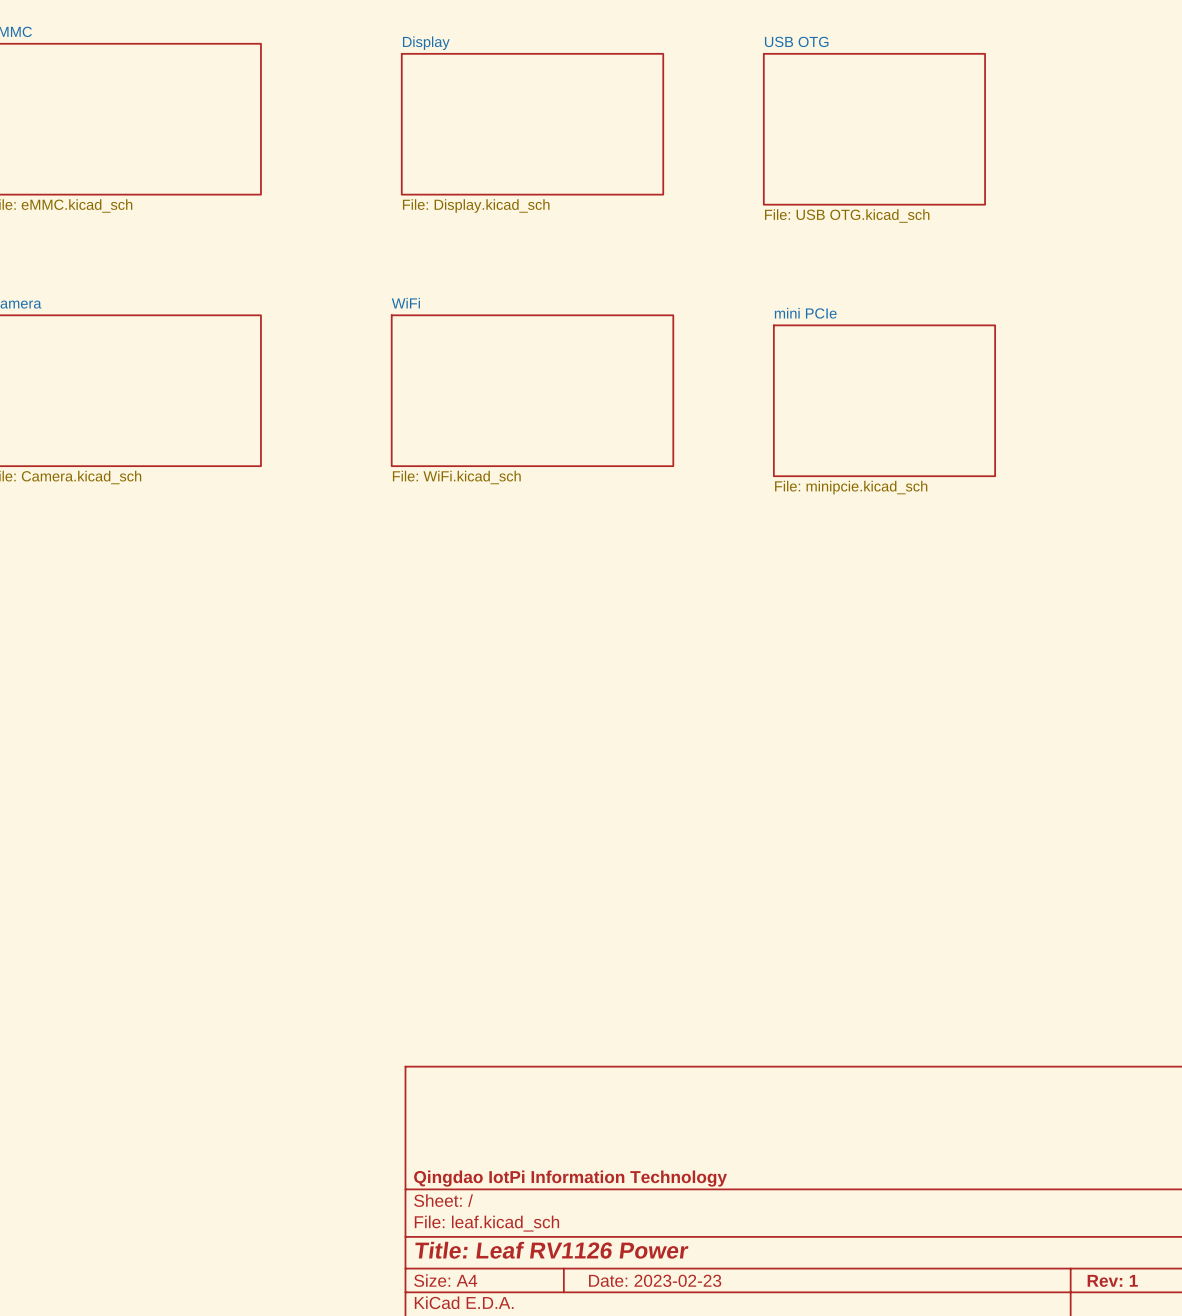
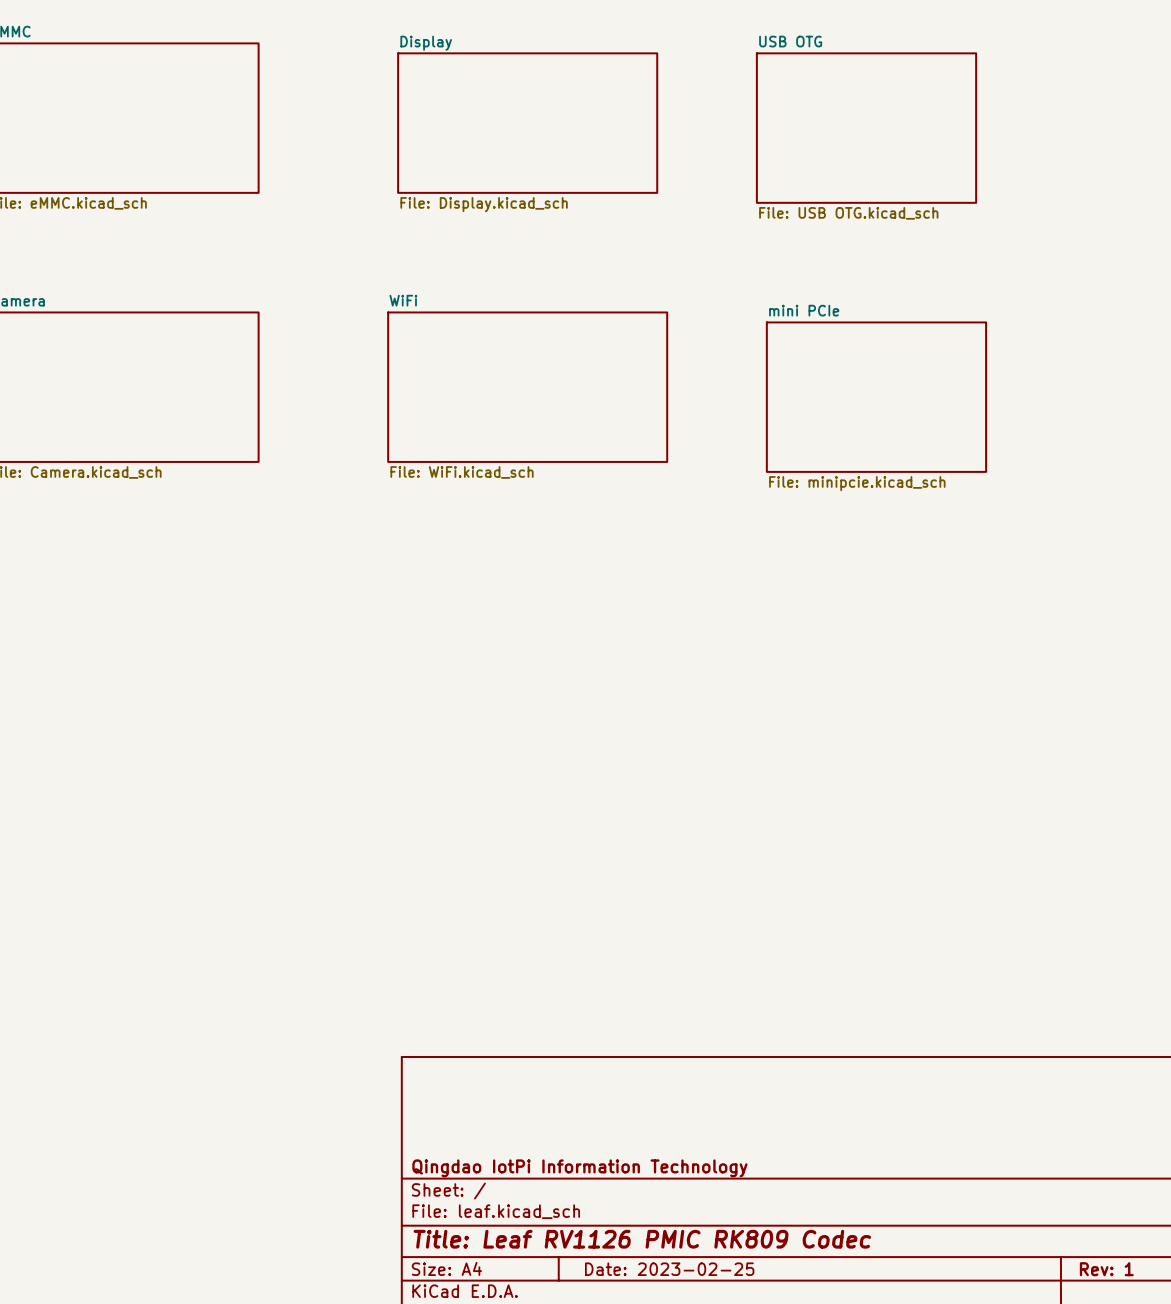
title block: Title: Leaf RV1126 Power (551, 1250) -> Title: Leaf RV1126 PMIC RK809 Codec (642, 1239)
title block: Date: 2023-02-23 (655, 1280) -> Date: 2023-02-25 (669, 1269)

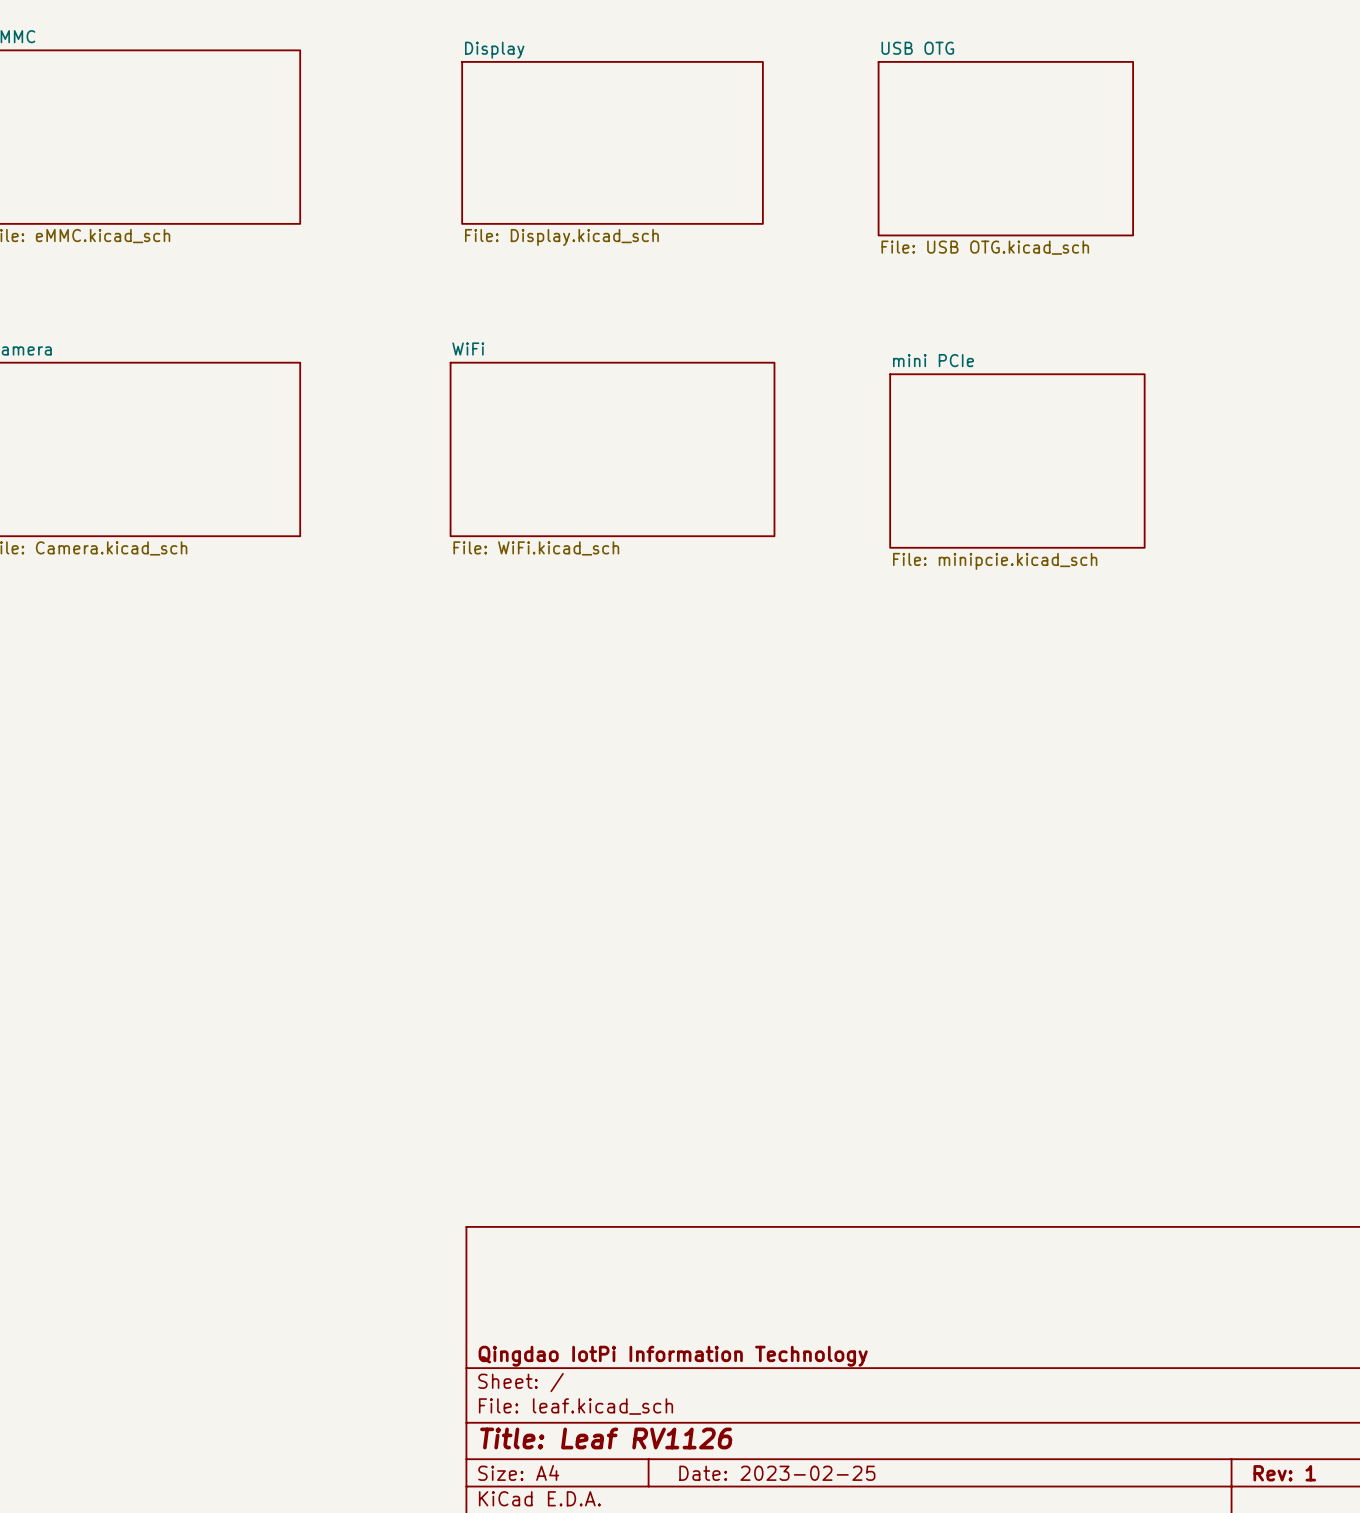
title block: Title: Leaf RV1126 PMIC RK809 Codec (642, 1239) -> Title: Leaf RV1126 (606, 1438)

